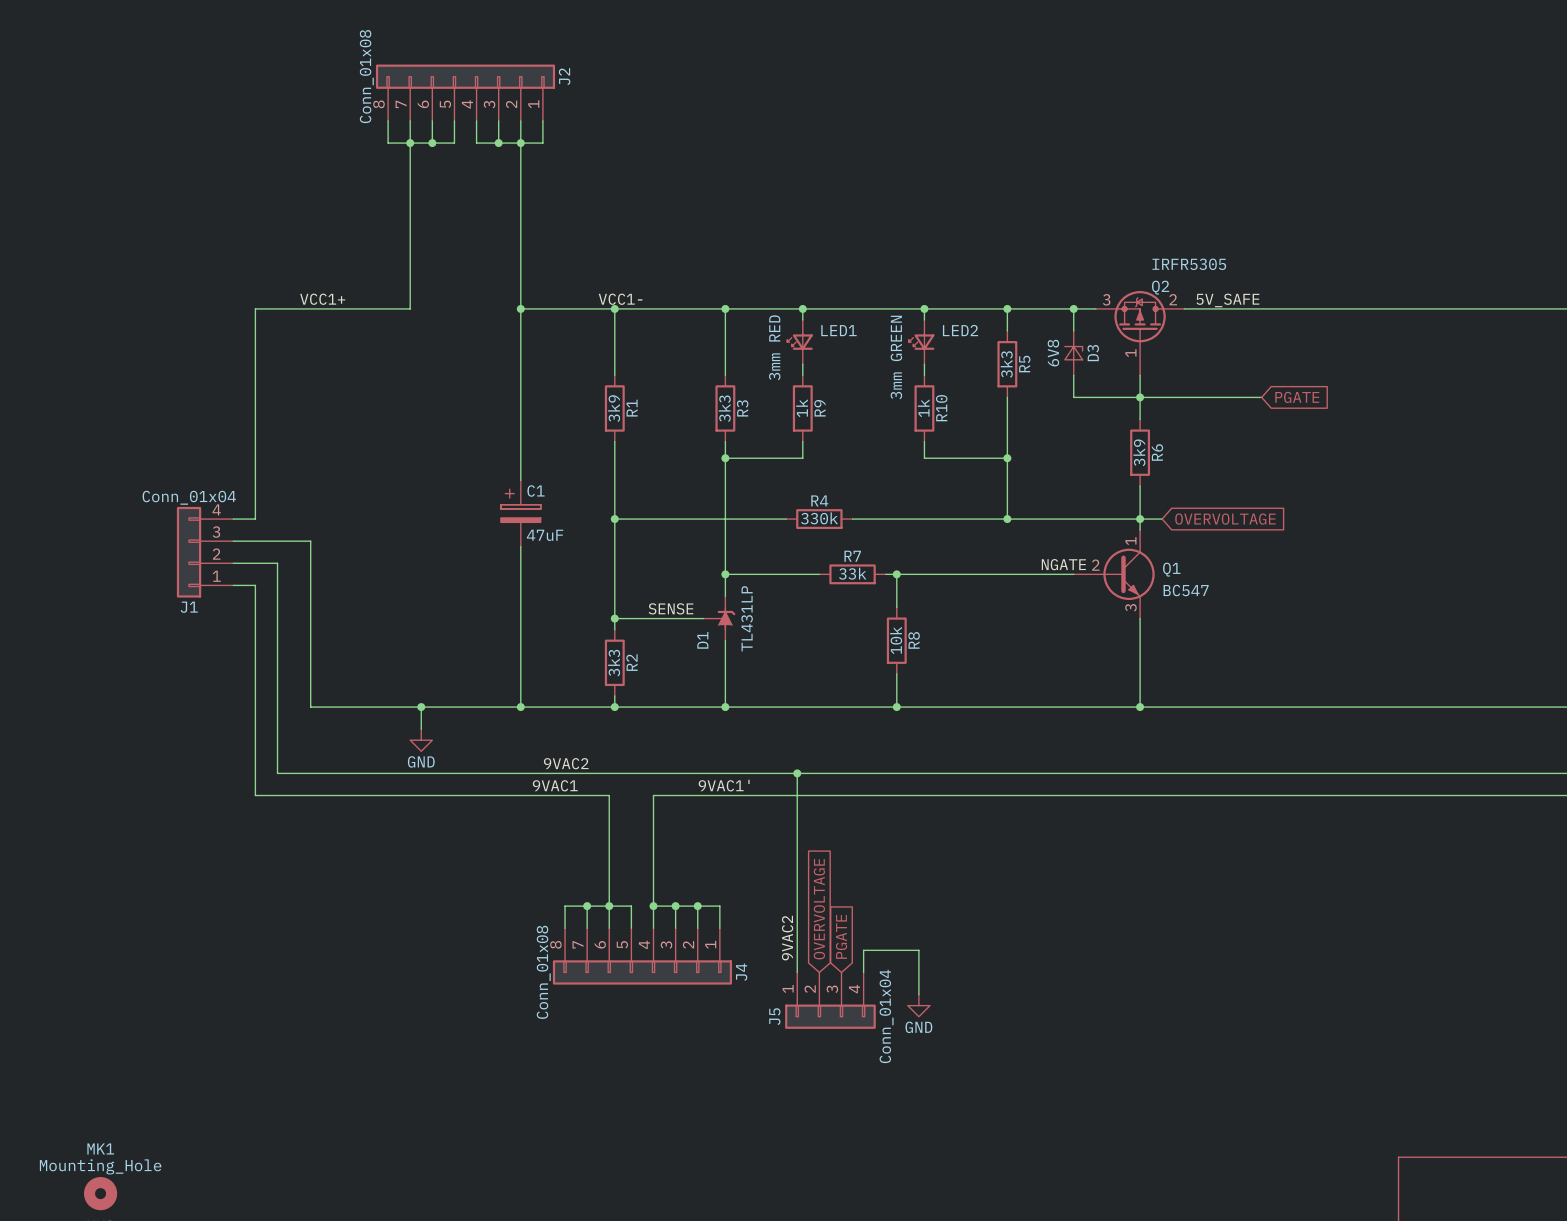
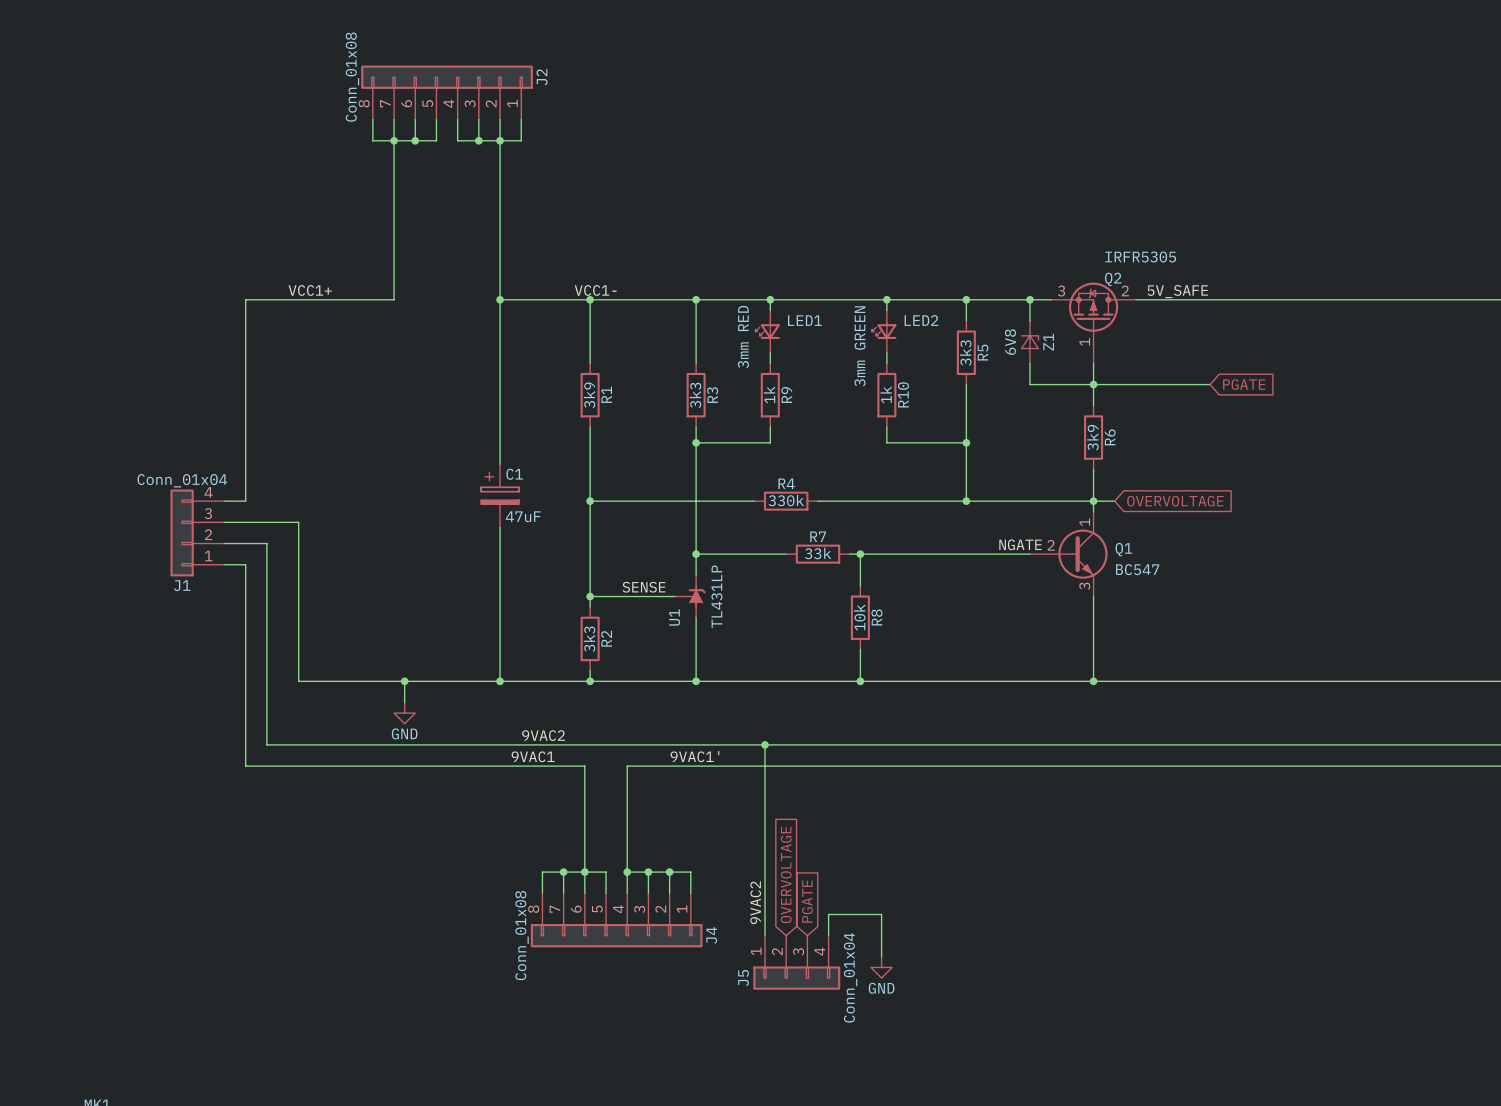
D3 name: D3 (1093, 353) -> Z1 (1048, 342)
D1 name: D1 (702, 640) -> U1 (674, 617)

